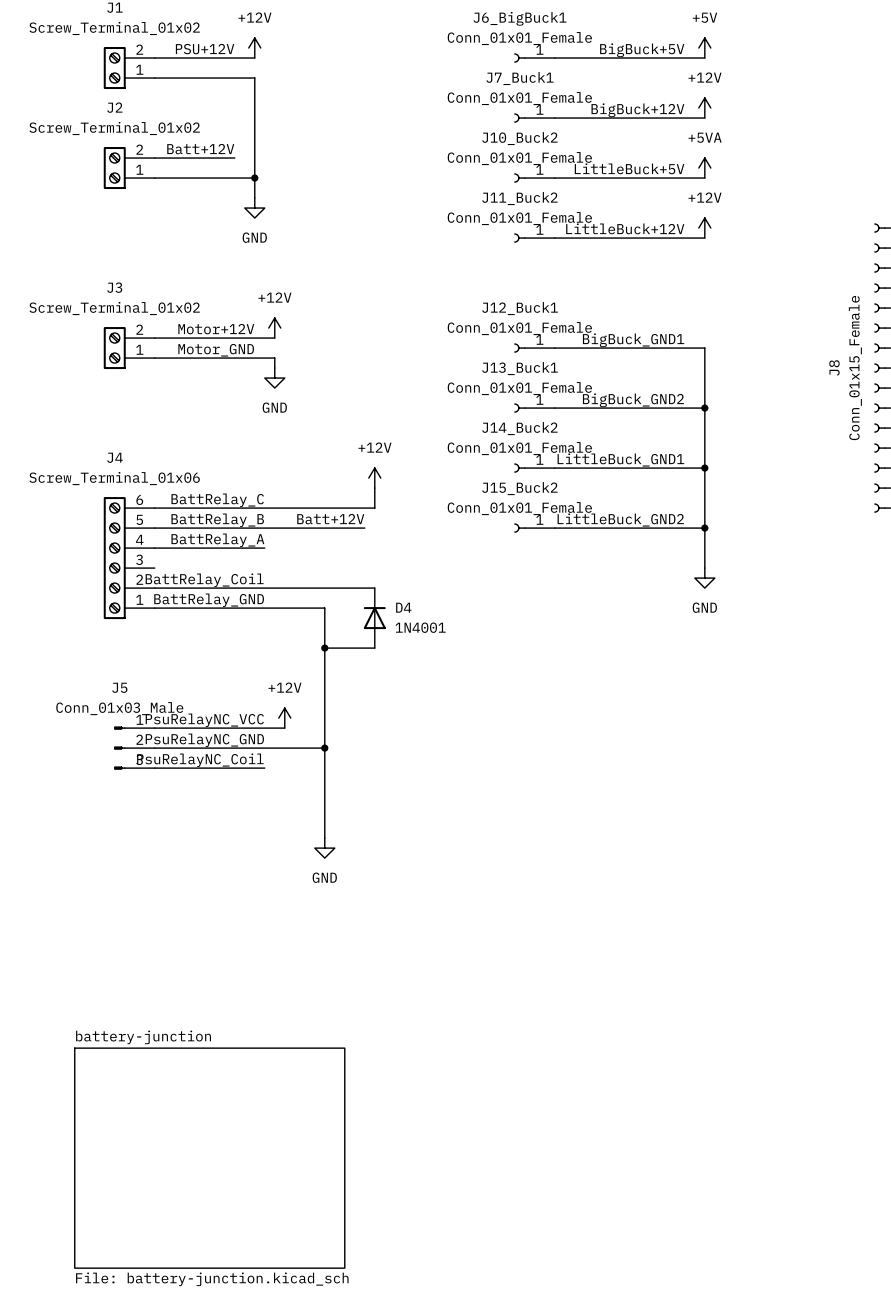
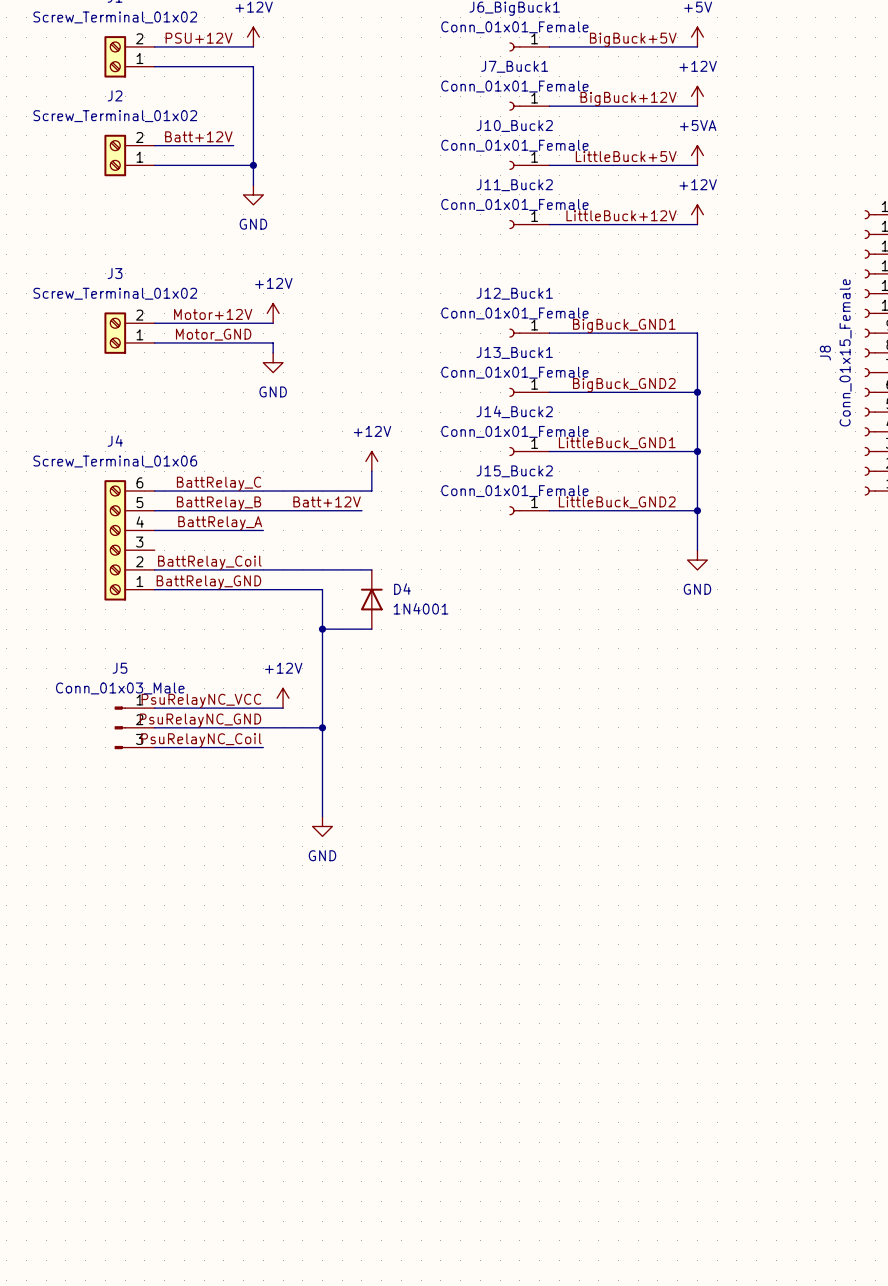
sheet battery-junction: File: battery-junction.kicad_sch (209, 1158) -> none

